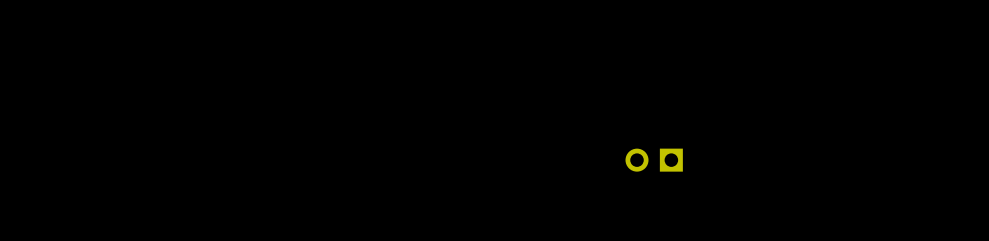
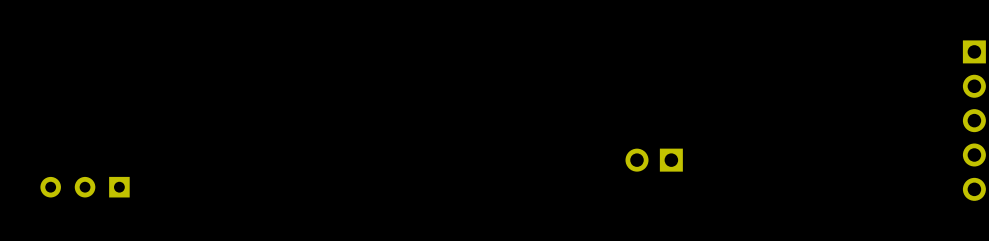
part: none -> (974, 120)
part: none -> (85, 187)

